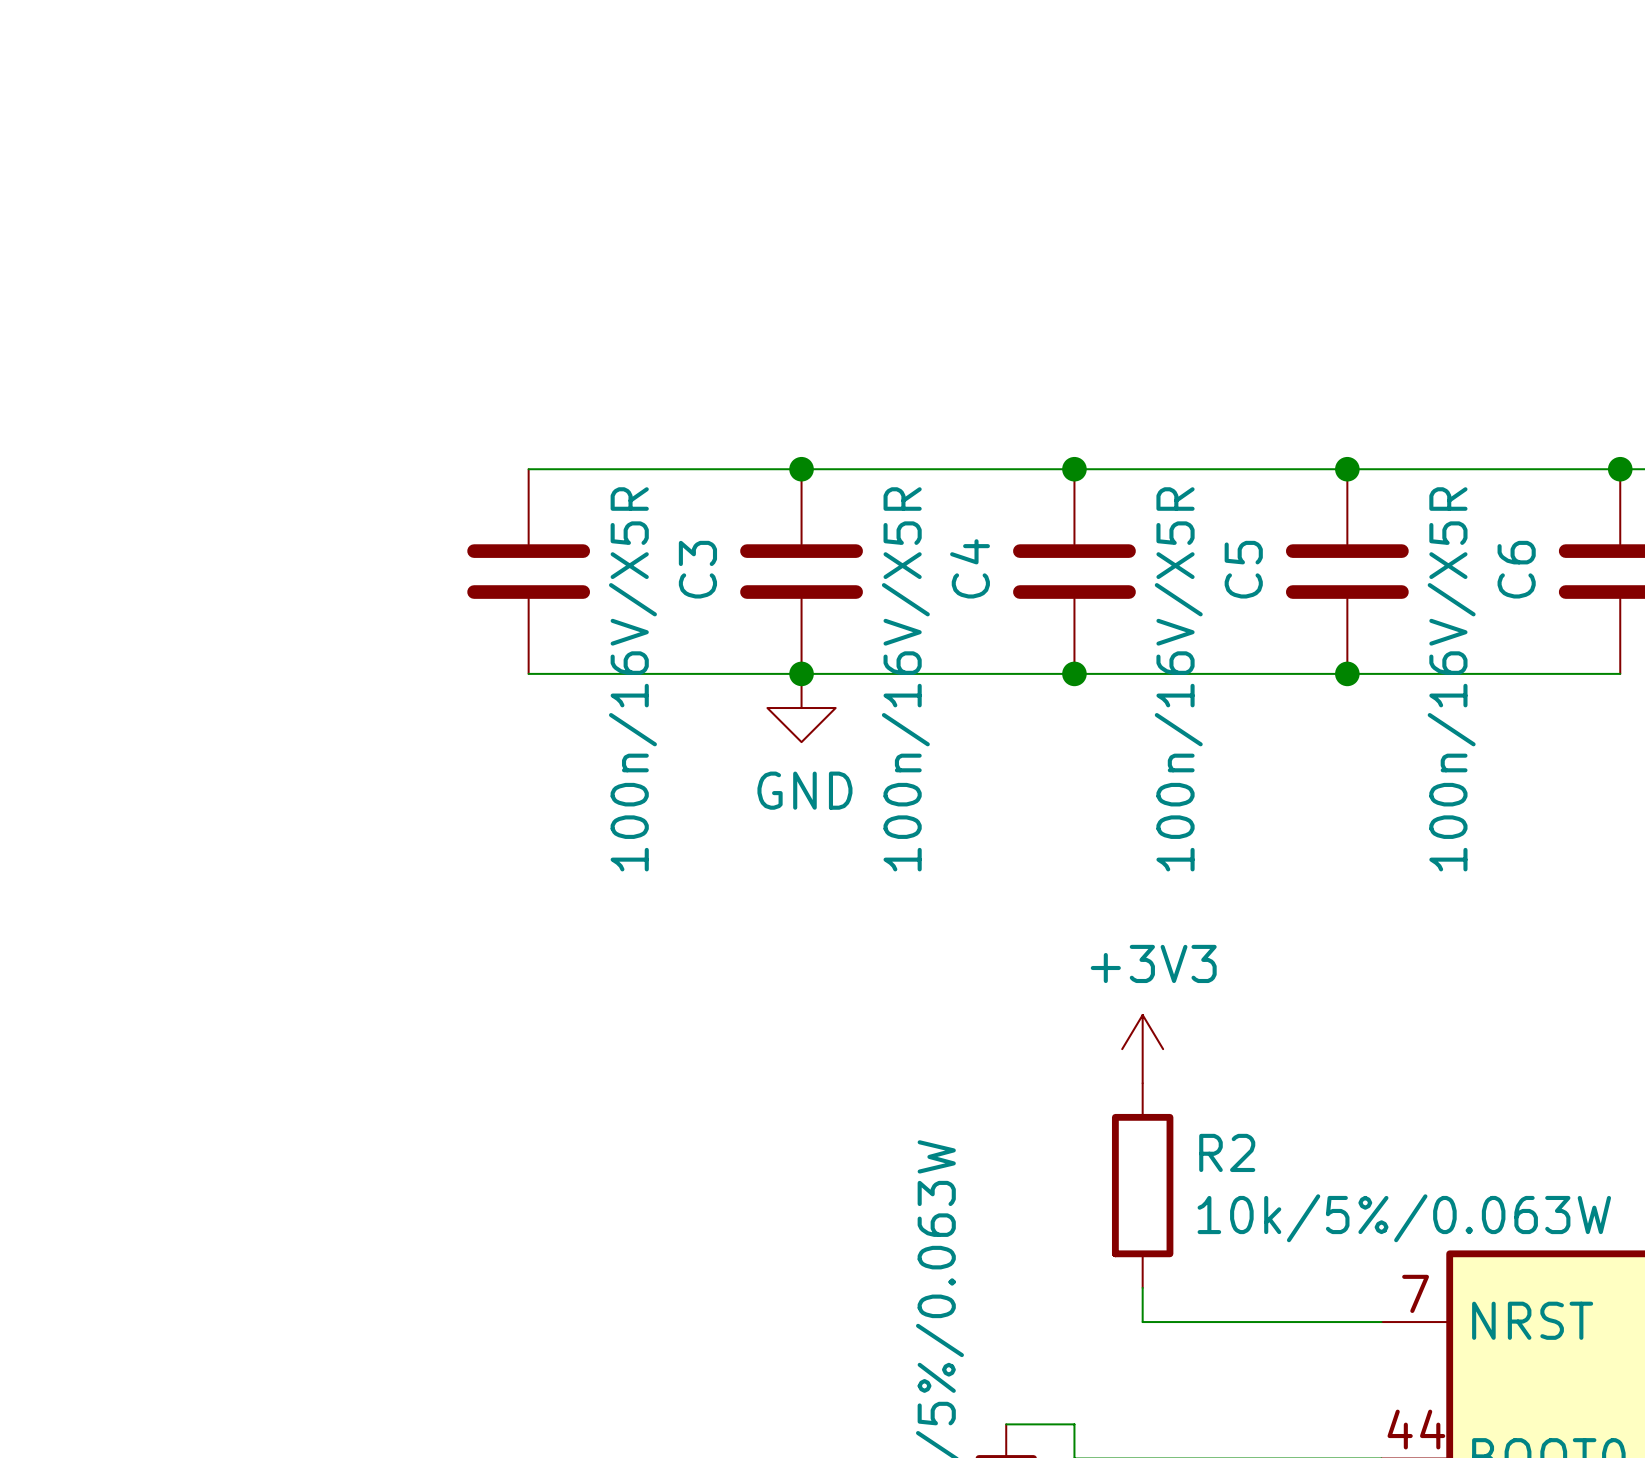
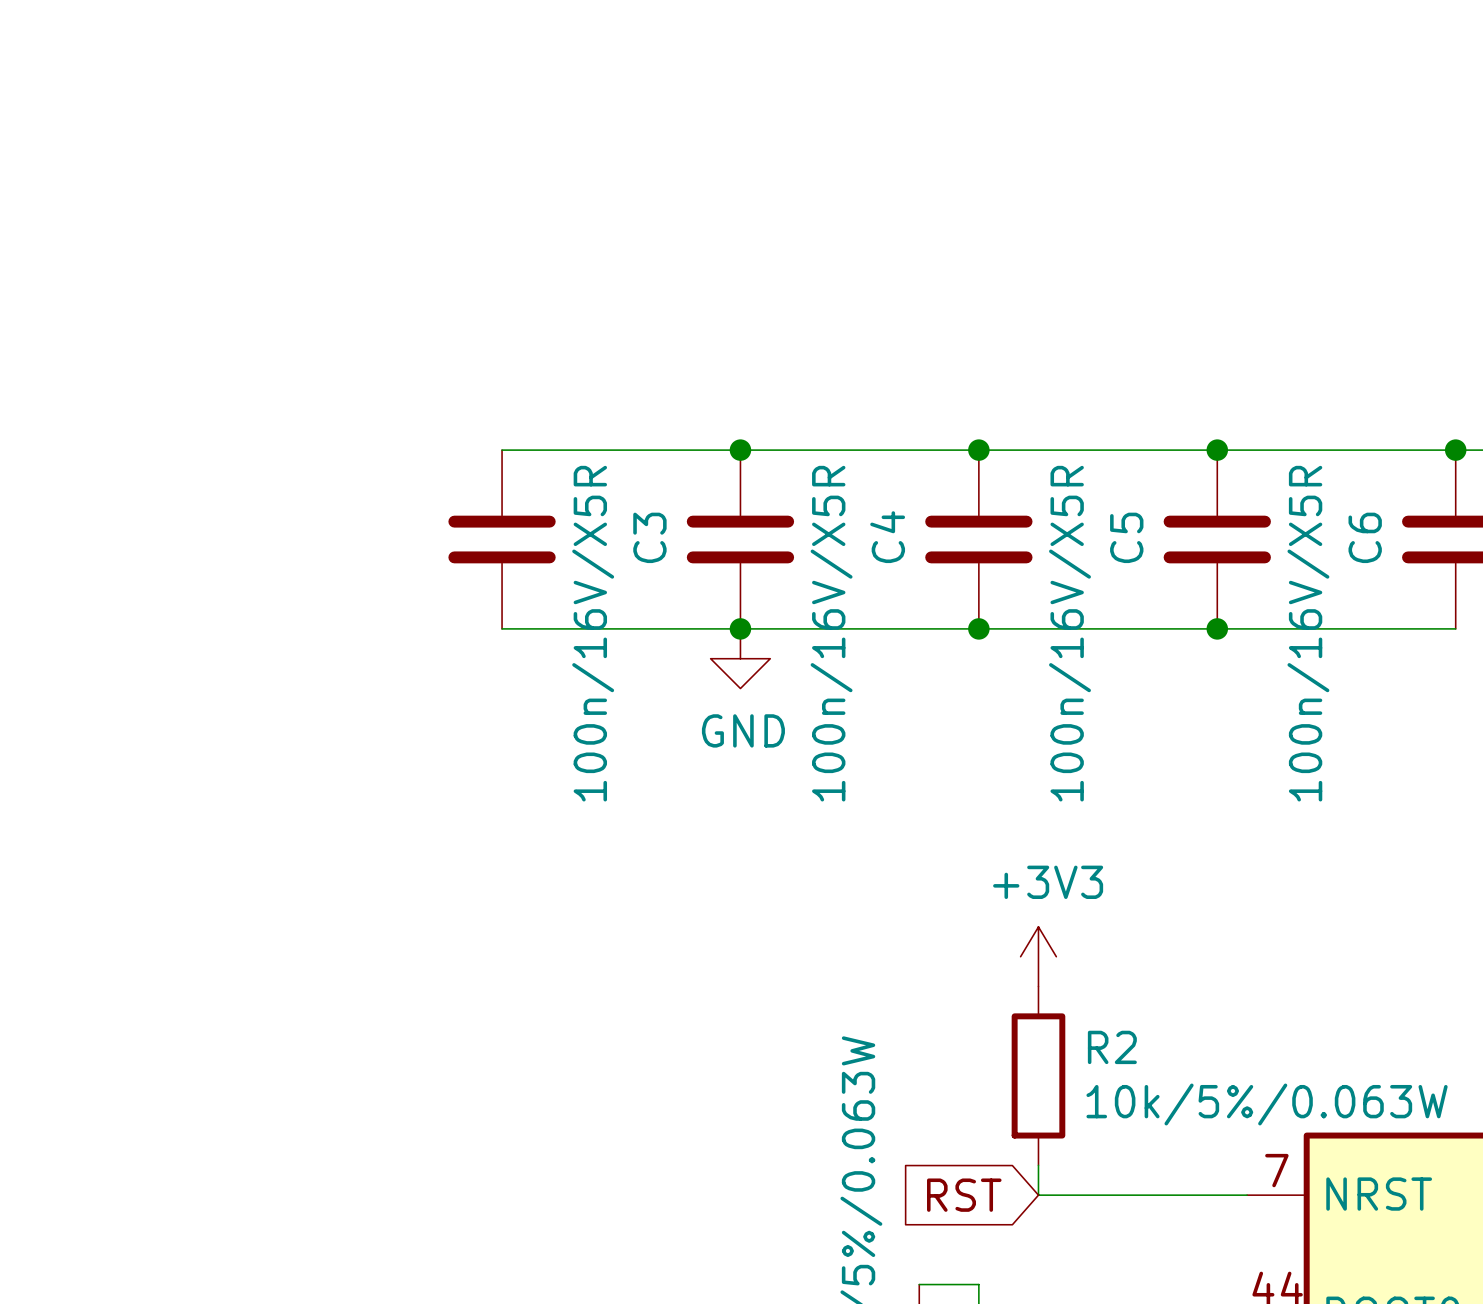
global label: none -> RST (964, 1195)

